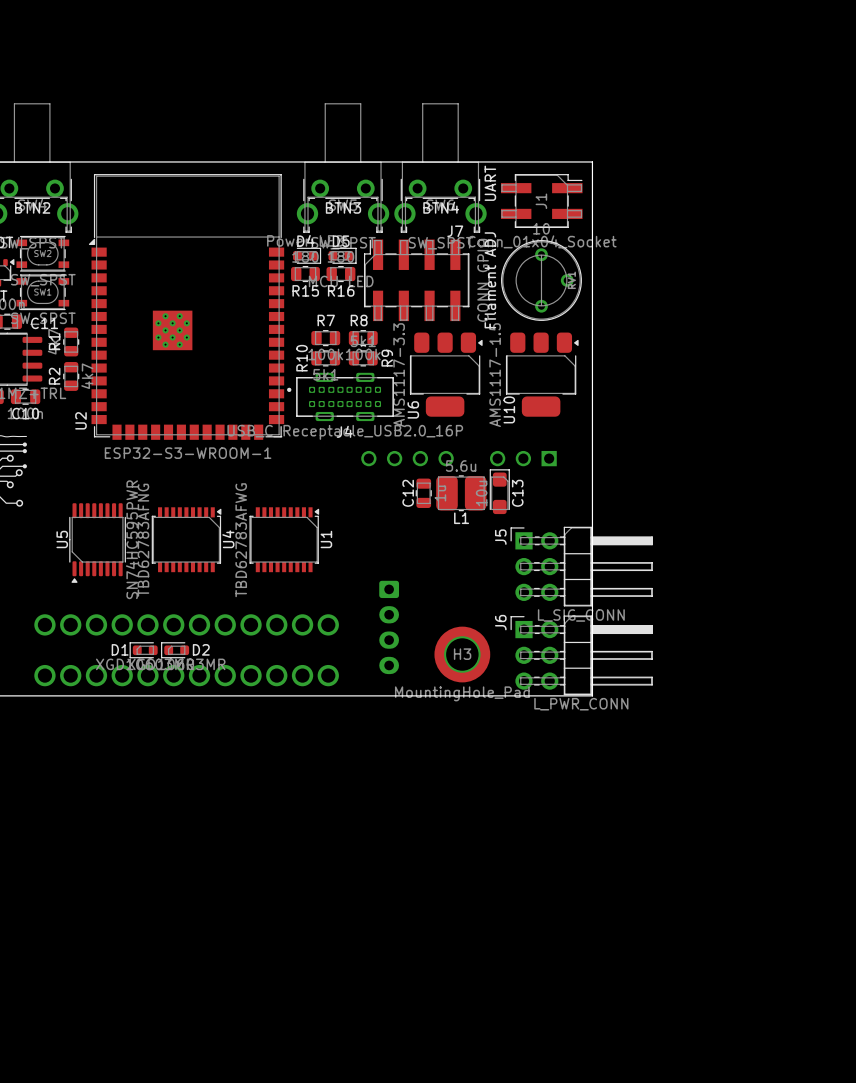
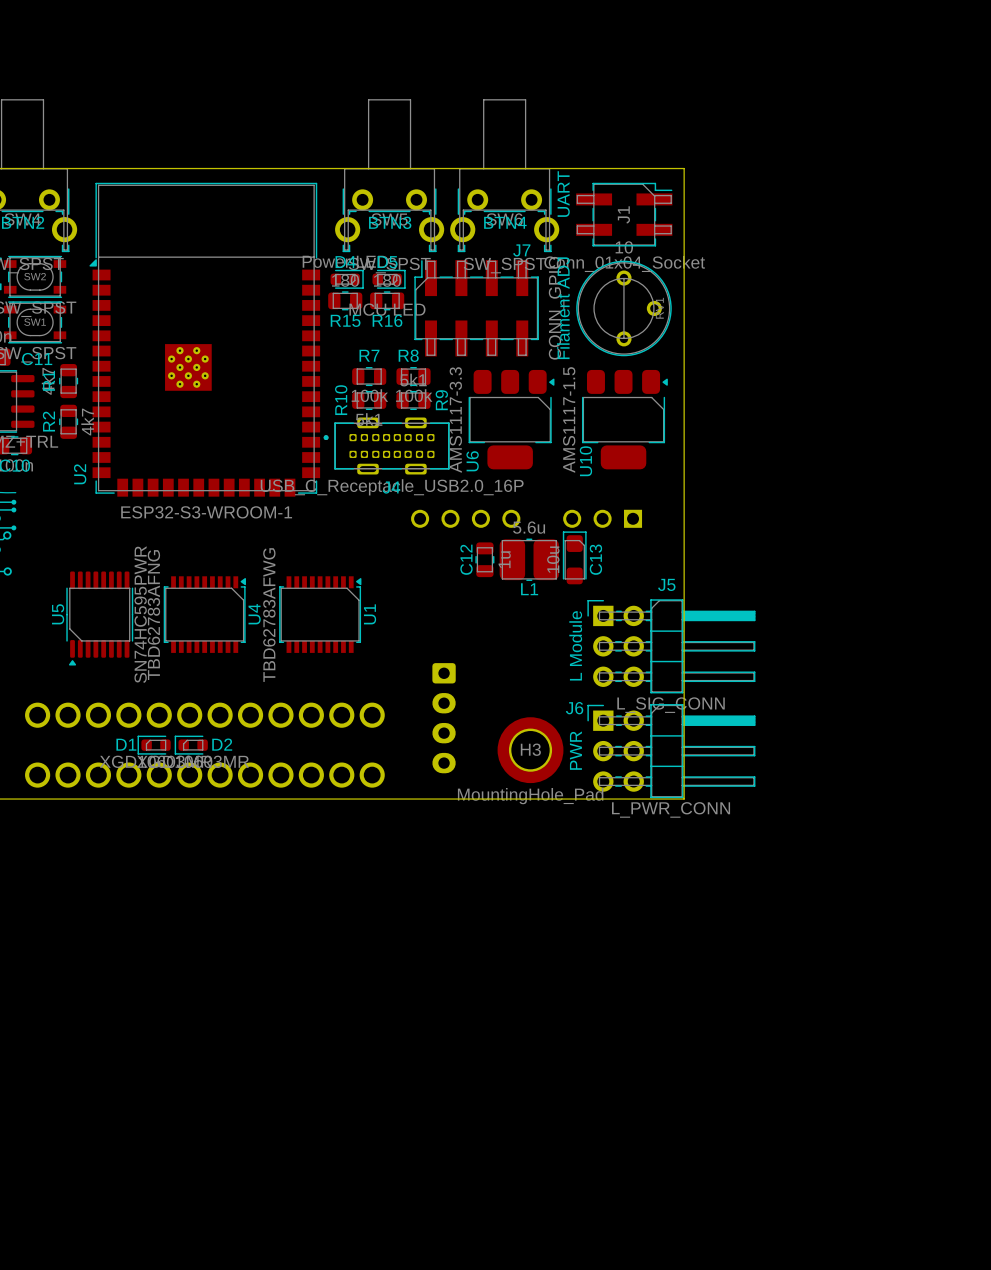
J5 name rotation: 0° (500, 537) -> 90° clockwise (666, 584)
J5 name position: J5 (500, 537) -> J5 (666, 584)
text: none -> L Module (575, 645)
J6 name rotation: 0° (500, 622) -> 90° clockwise (574, 708)
text: none -> PWR (575, 750)

